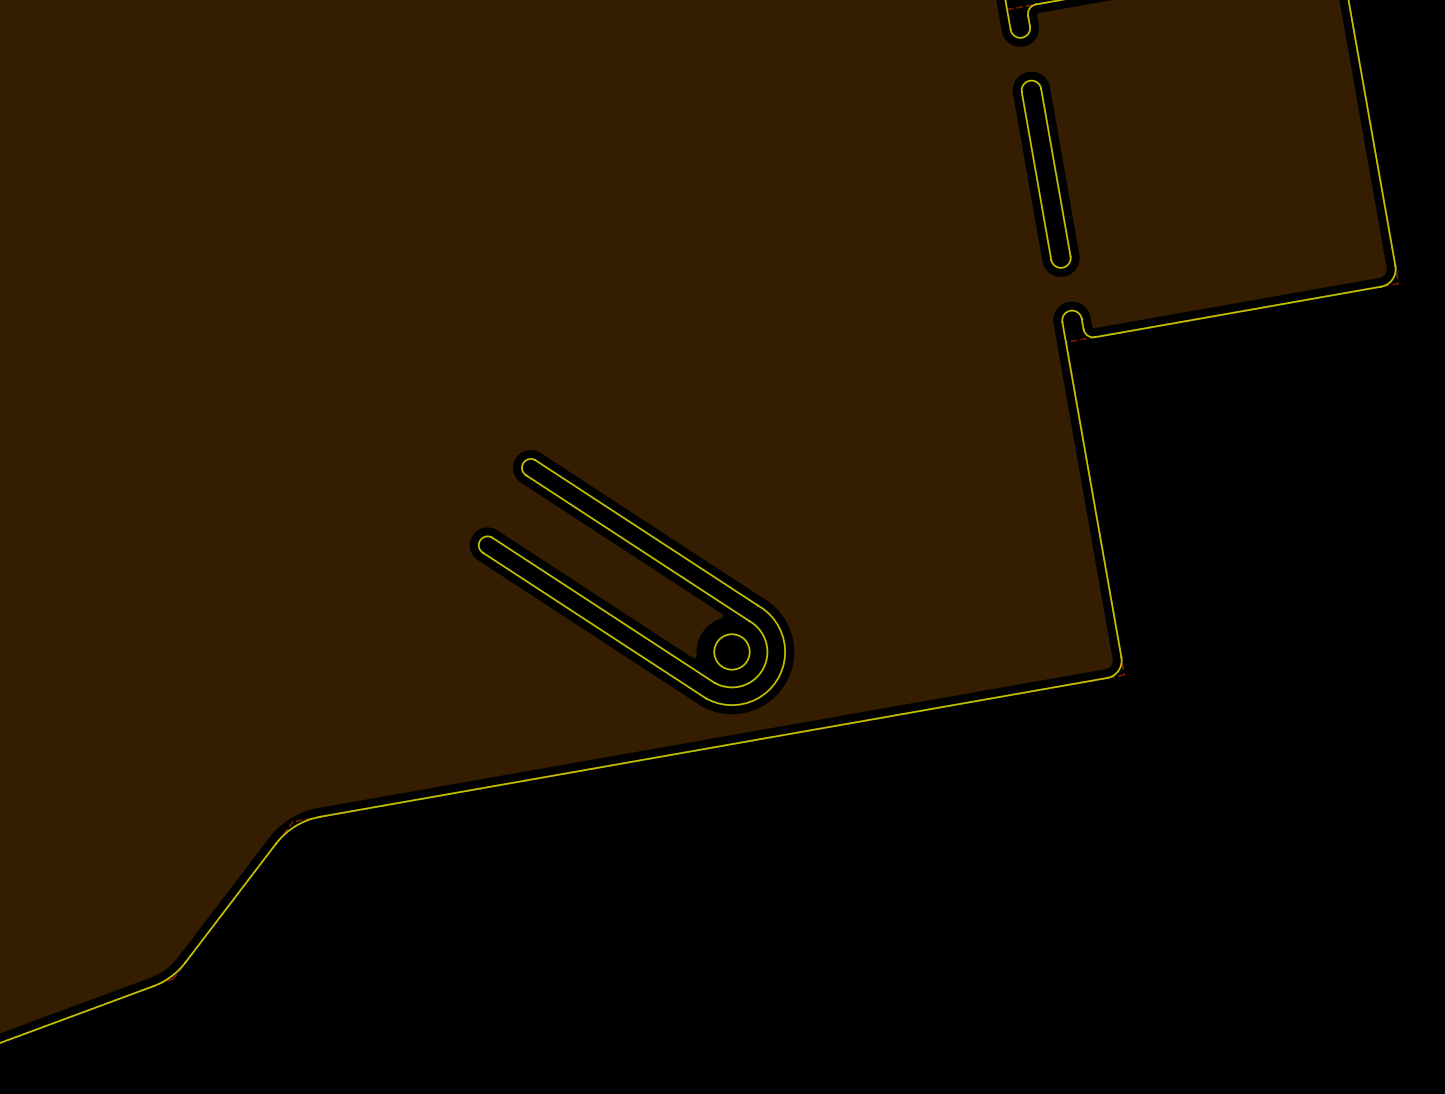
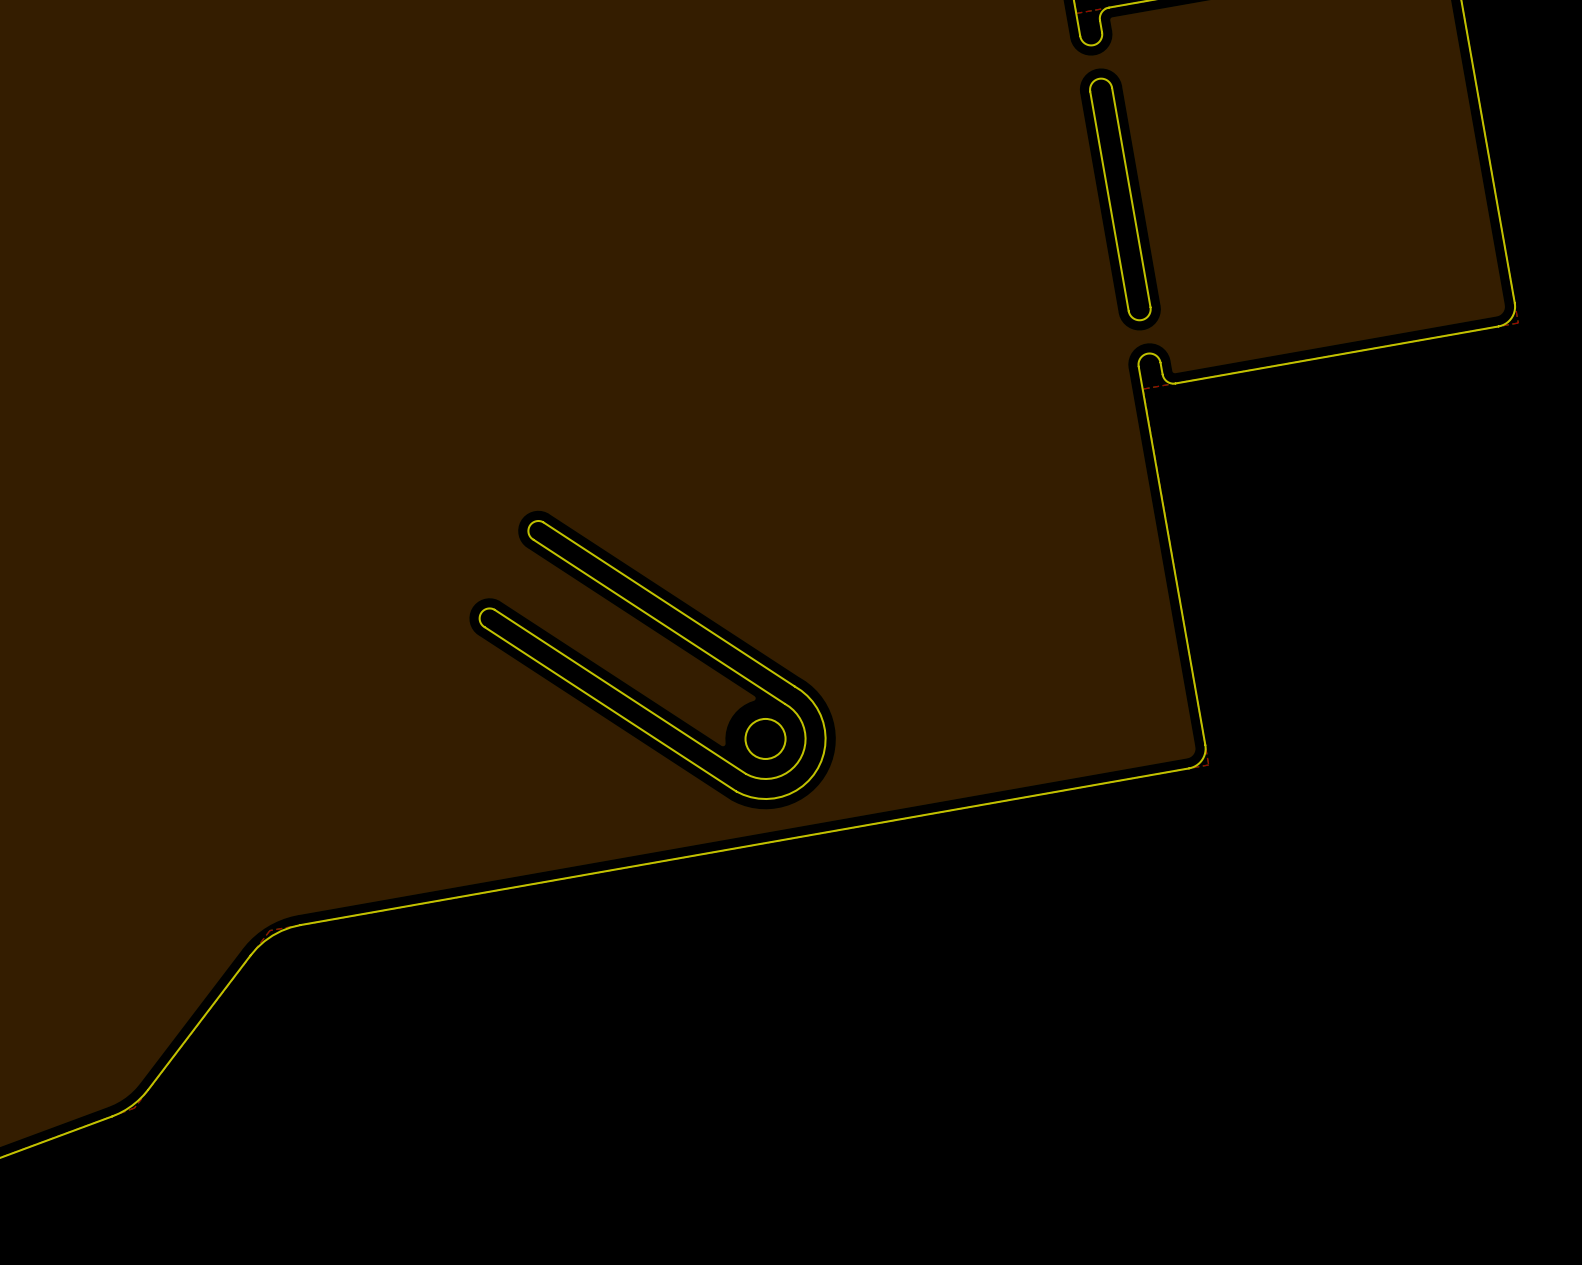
board edge: (1041, 88) (1070, 256) (1068, 263) (1062, 267) (1055, 266) (1051, 259) (1021, 92) (1023, 84) (1029, 80) (1037, 82) (1041, 88) -> (1112, 87) (1107, 80) (1099, 78) (1092, 83) (1090, 91) (1128, 311) (1133, 318) (1141, 320) (1148, 315) (1150, 307) (1112, 87)

